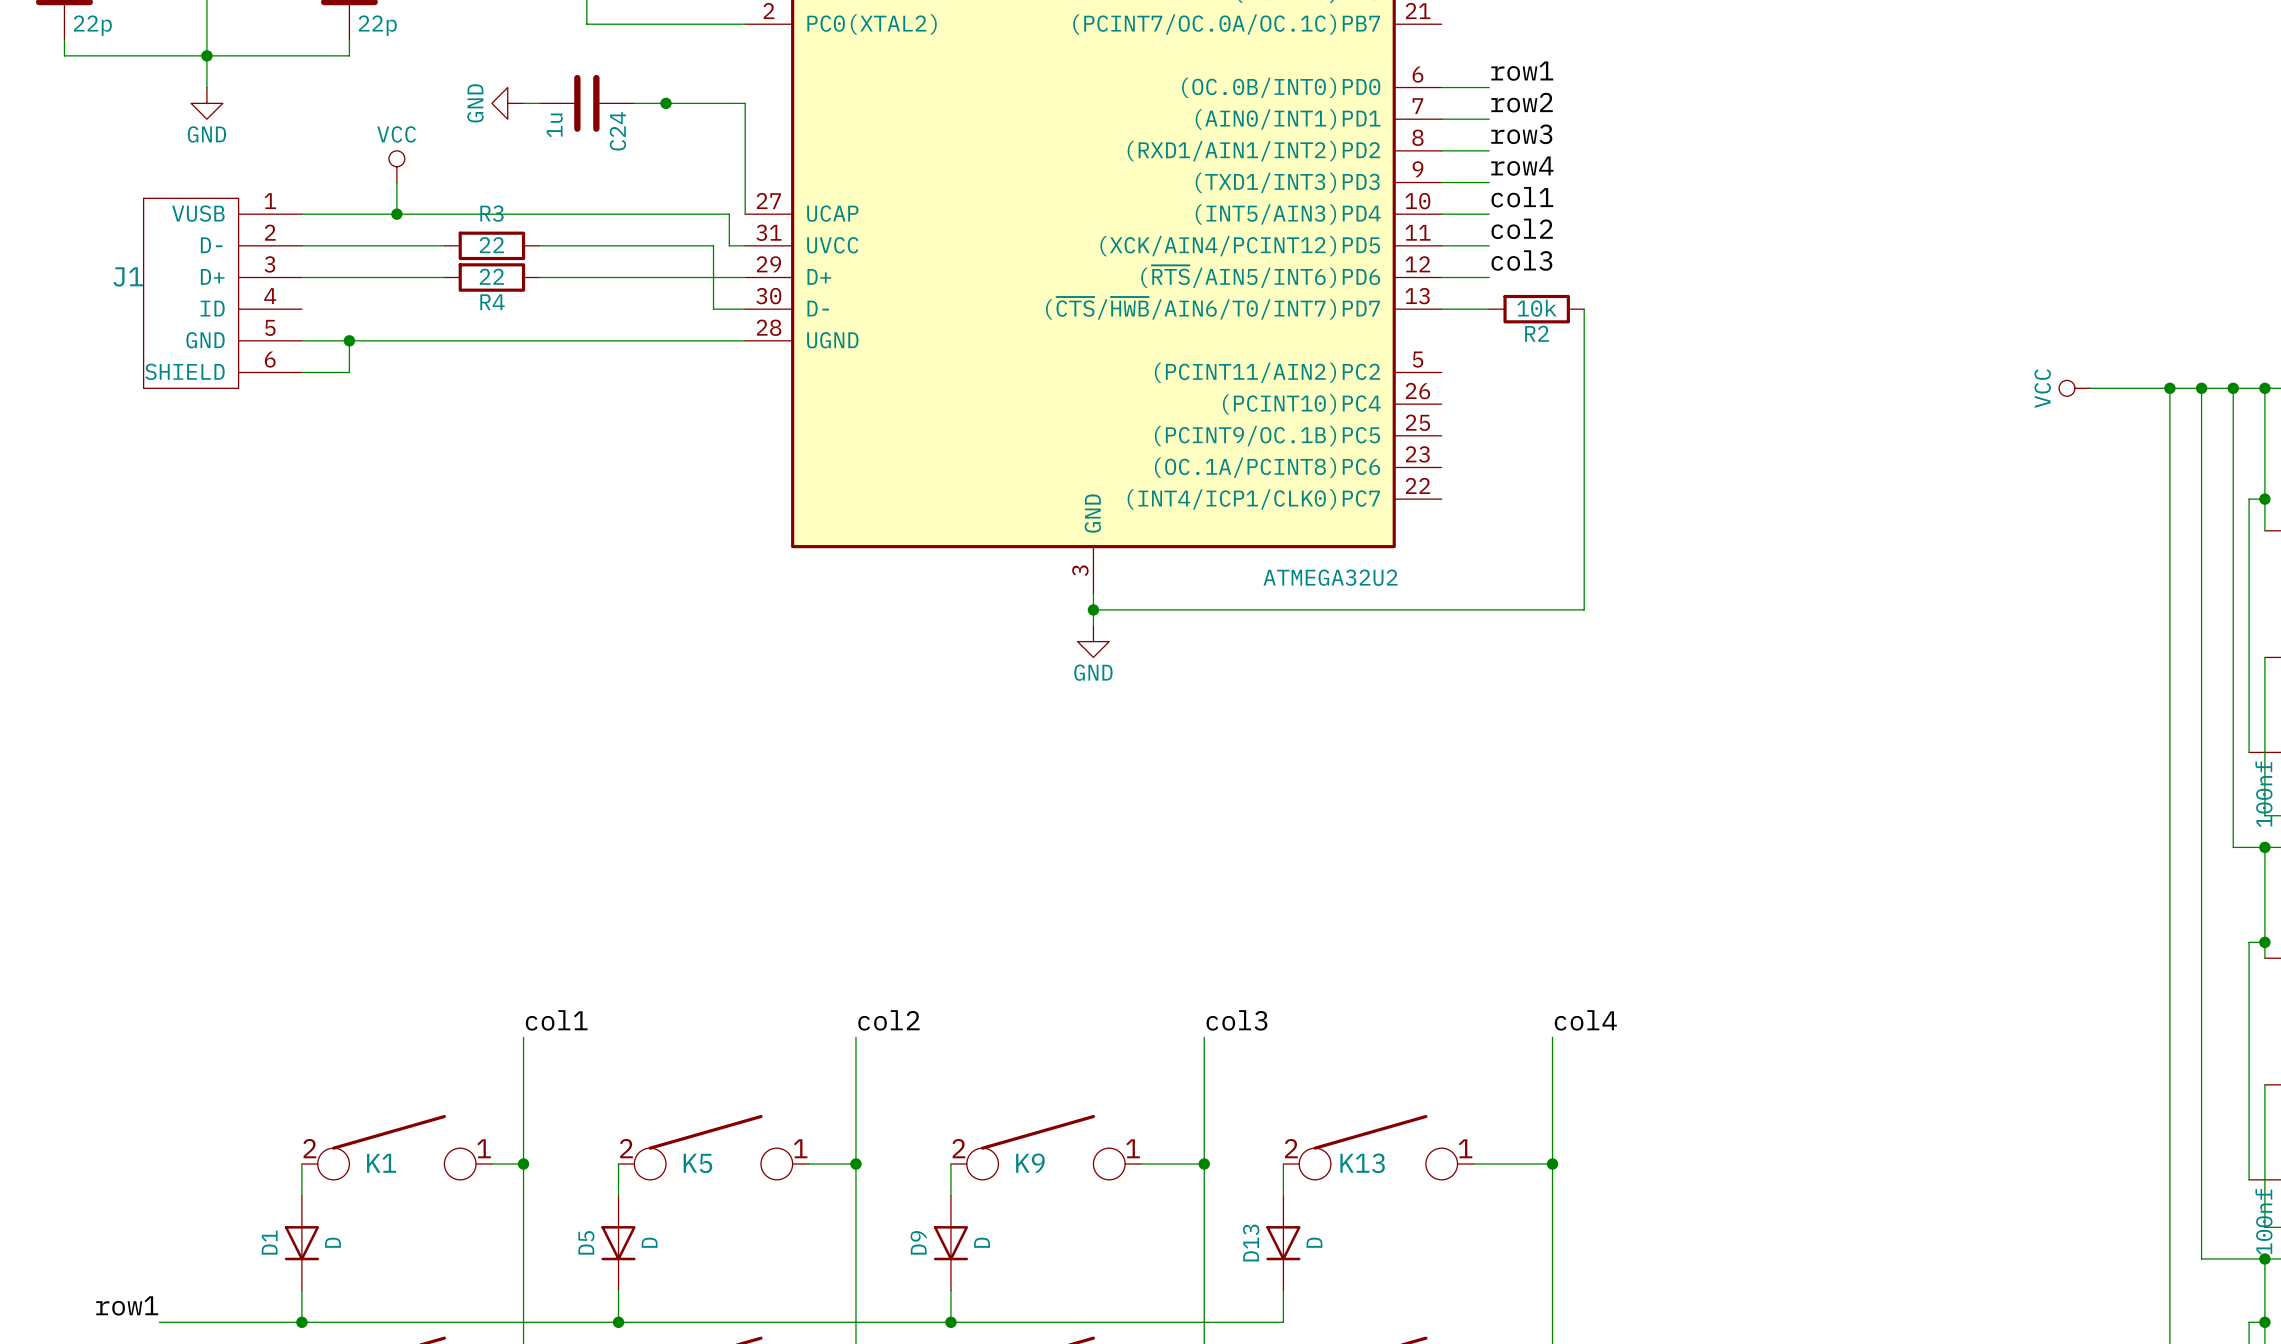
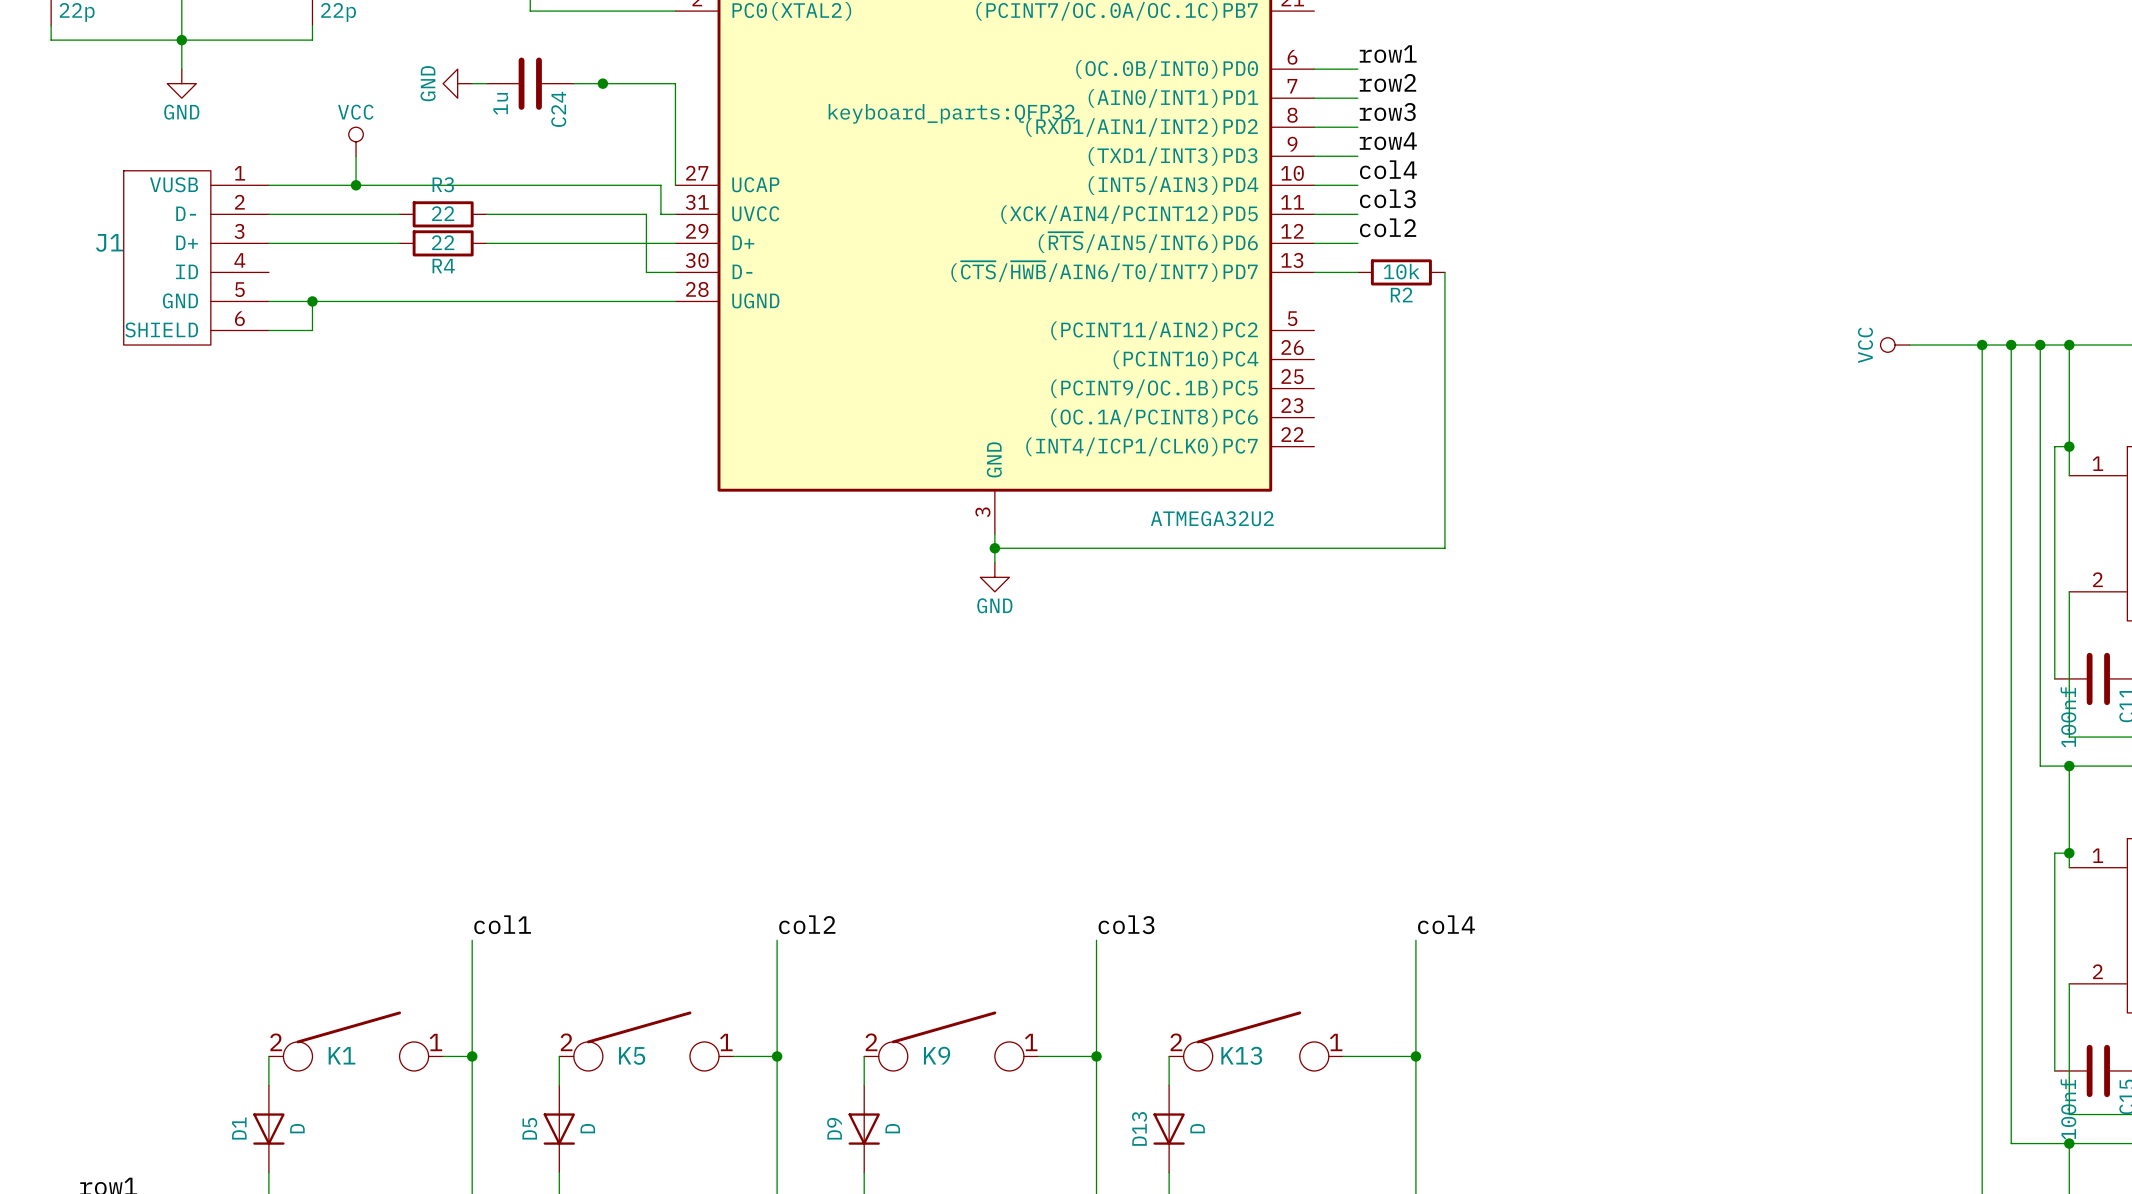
part text: none -> keyboard_parts:QFP32 (951, 113)
label: col1 (1522, 197) -> col4 (1388, 169)
label: col2 (1522, 228) -> col3 (1387, 198)
label: col3 (1521, 260) -> col2 (1388, 227)

